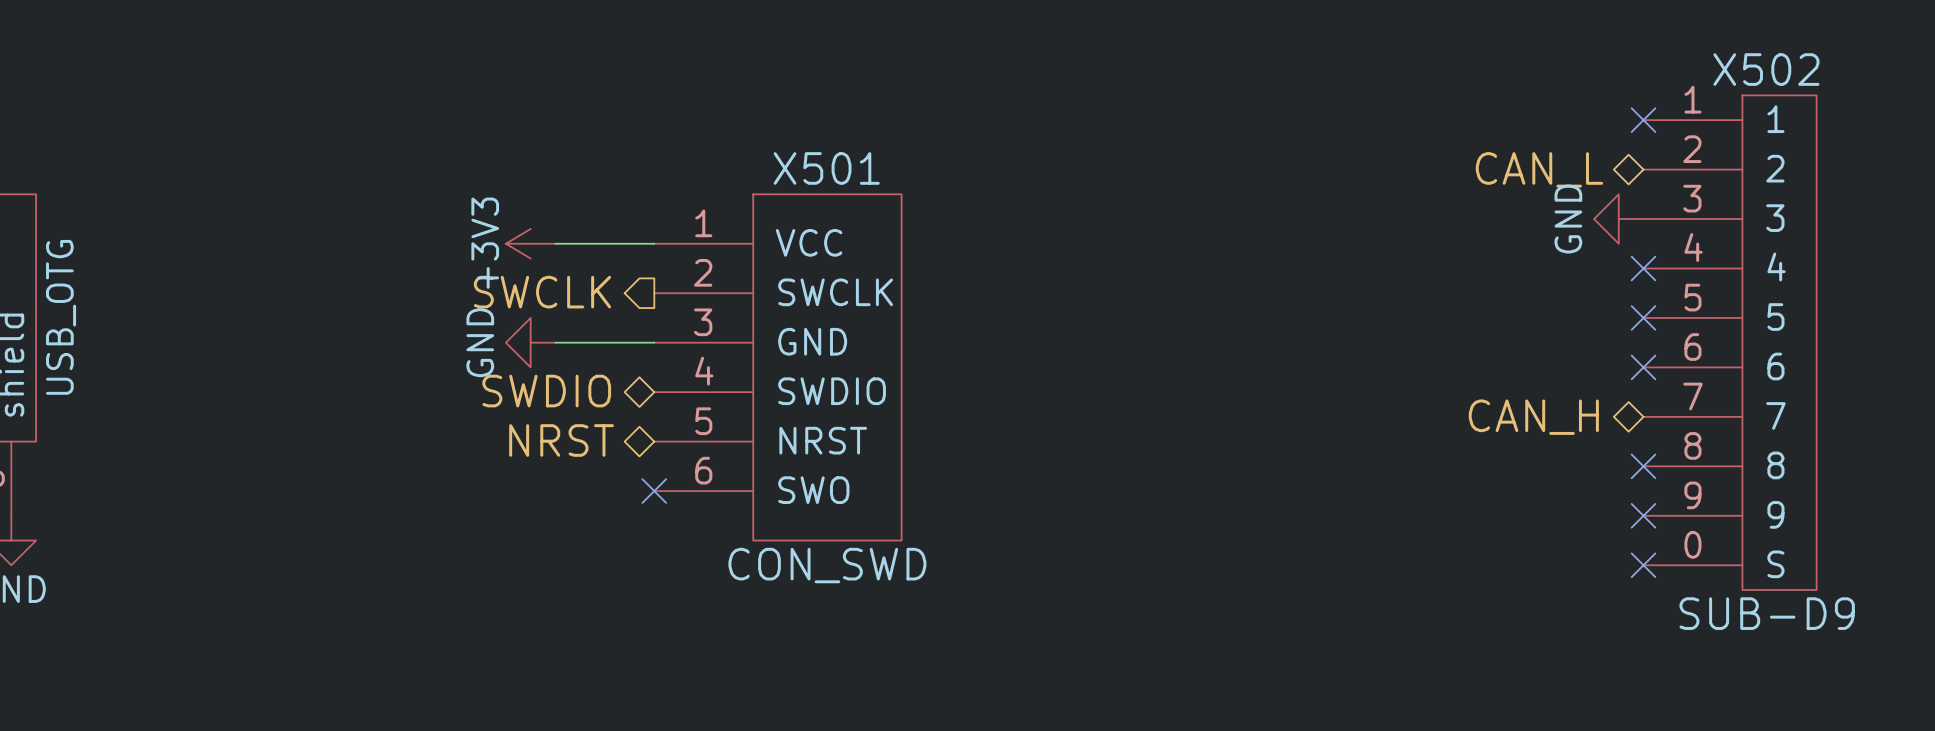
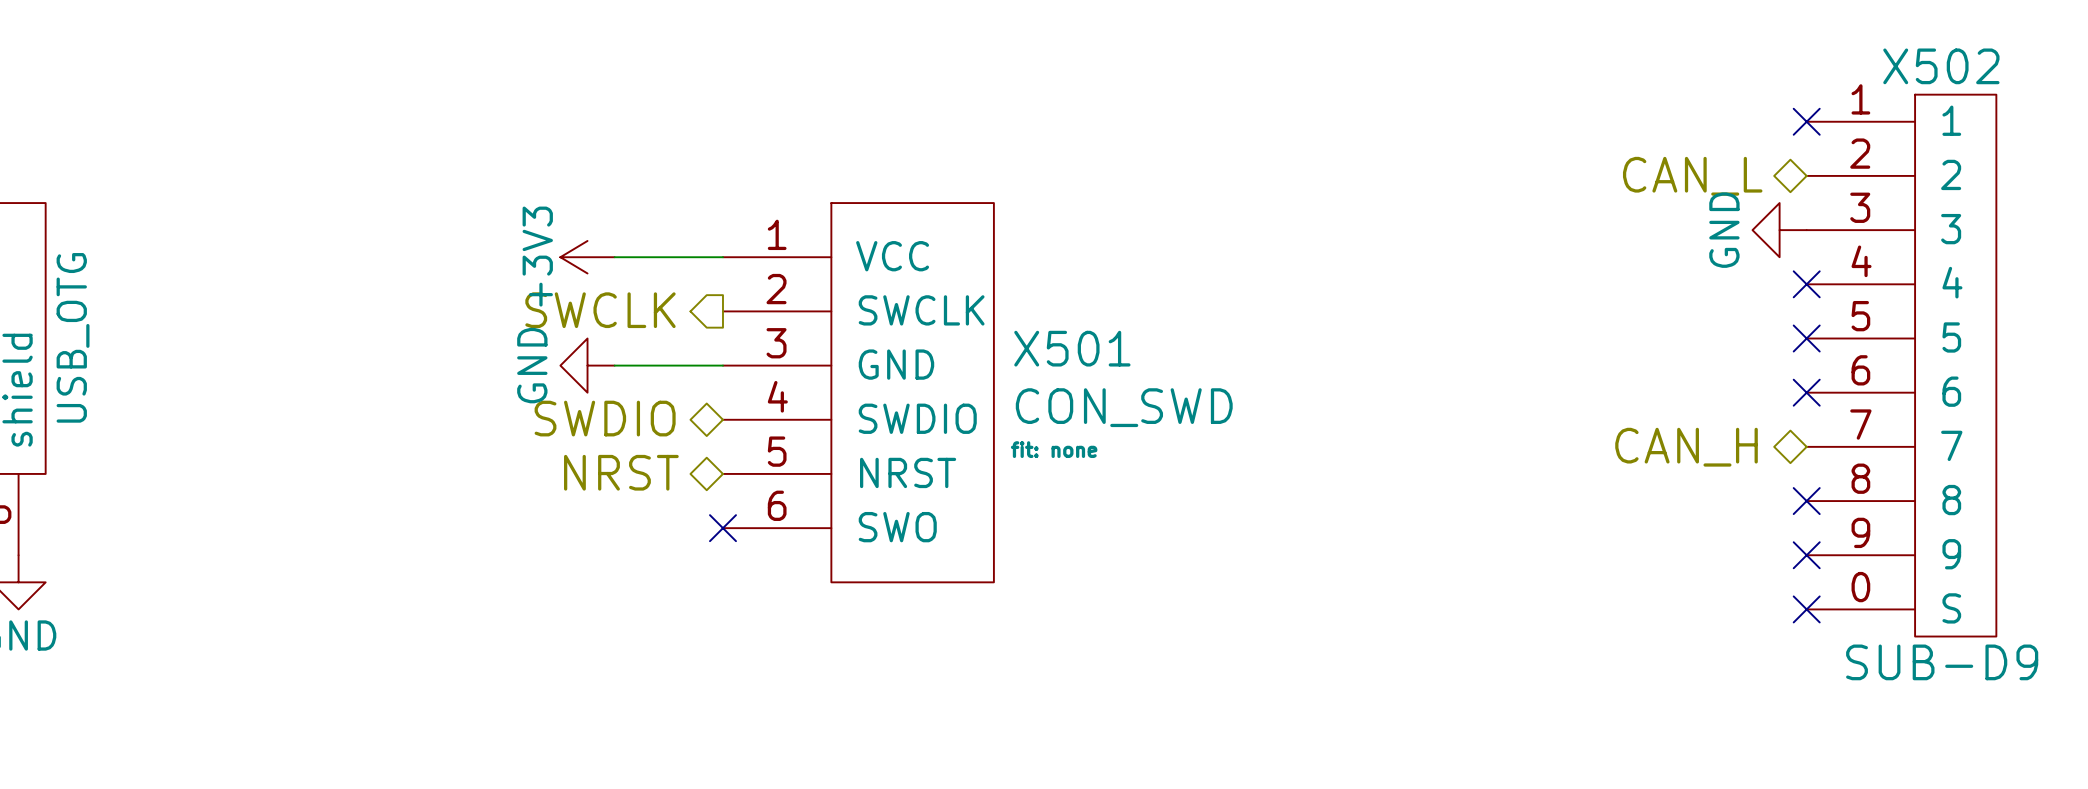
X501 name position: X501 (826, 168) -> X501 (1072, 348)
X501 text: none -> fit: none (1054, 449)
X501 value position: CON_SWD (827, 565) -> CON_SWD (1124, 407)

